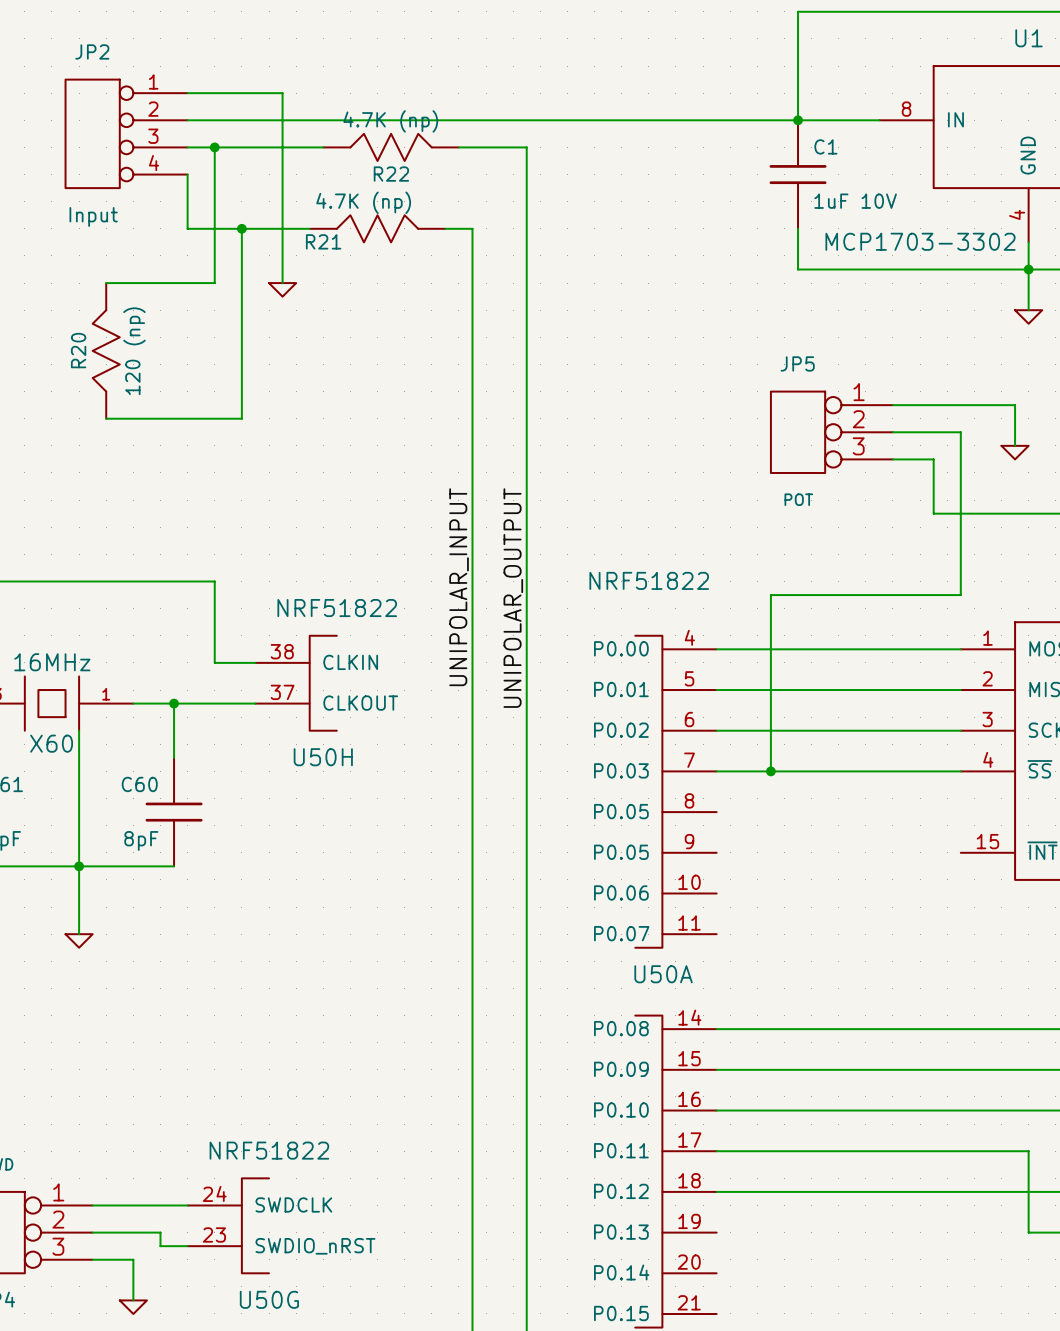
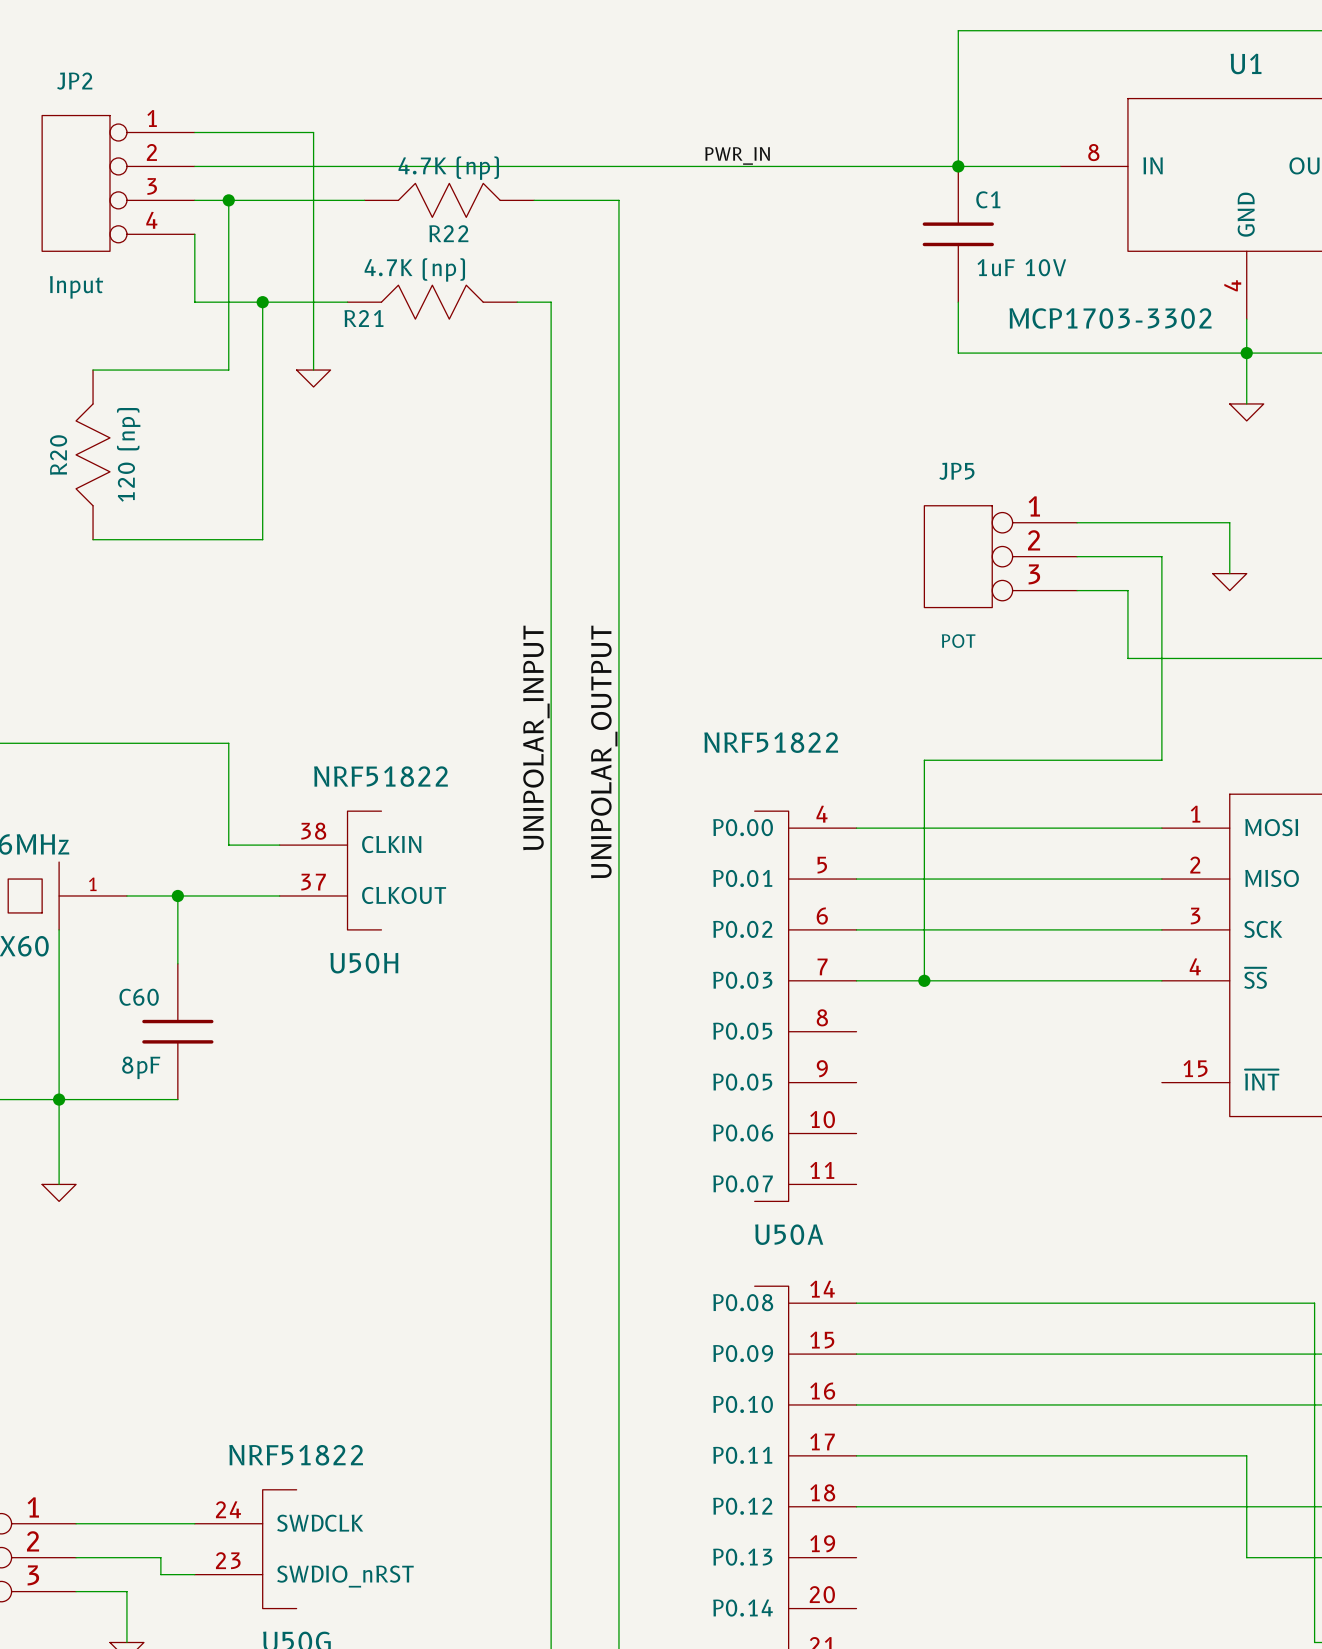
label: none -> PWR_IN (737, 155)

